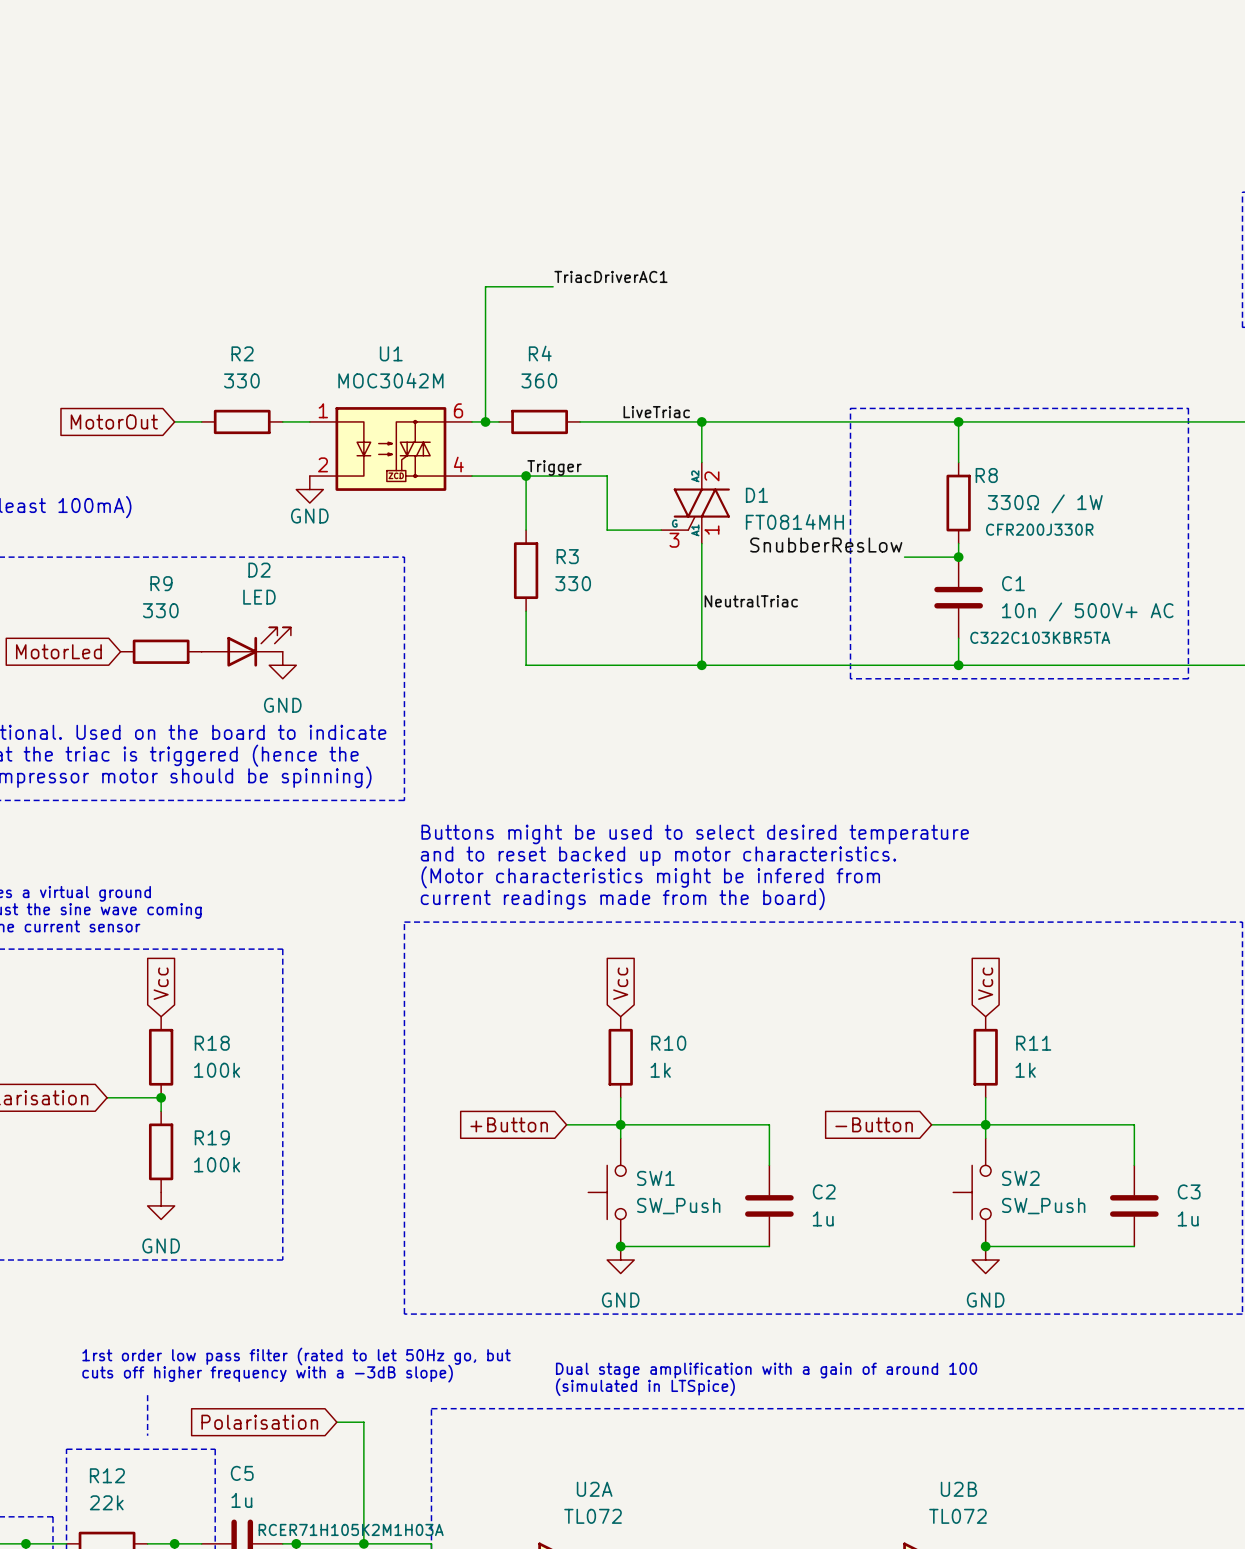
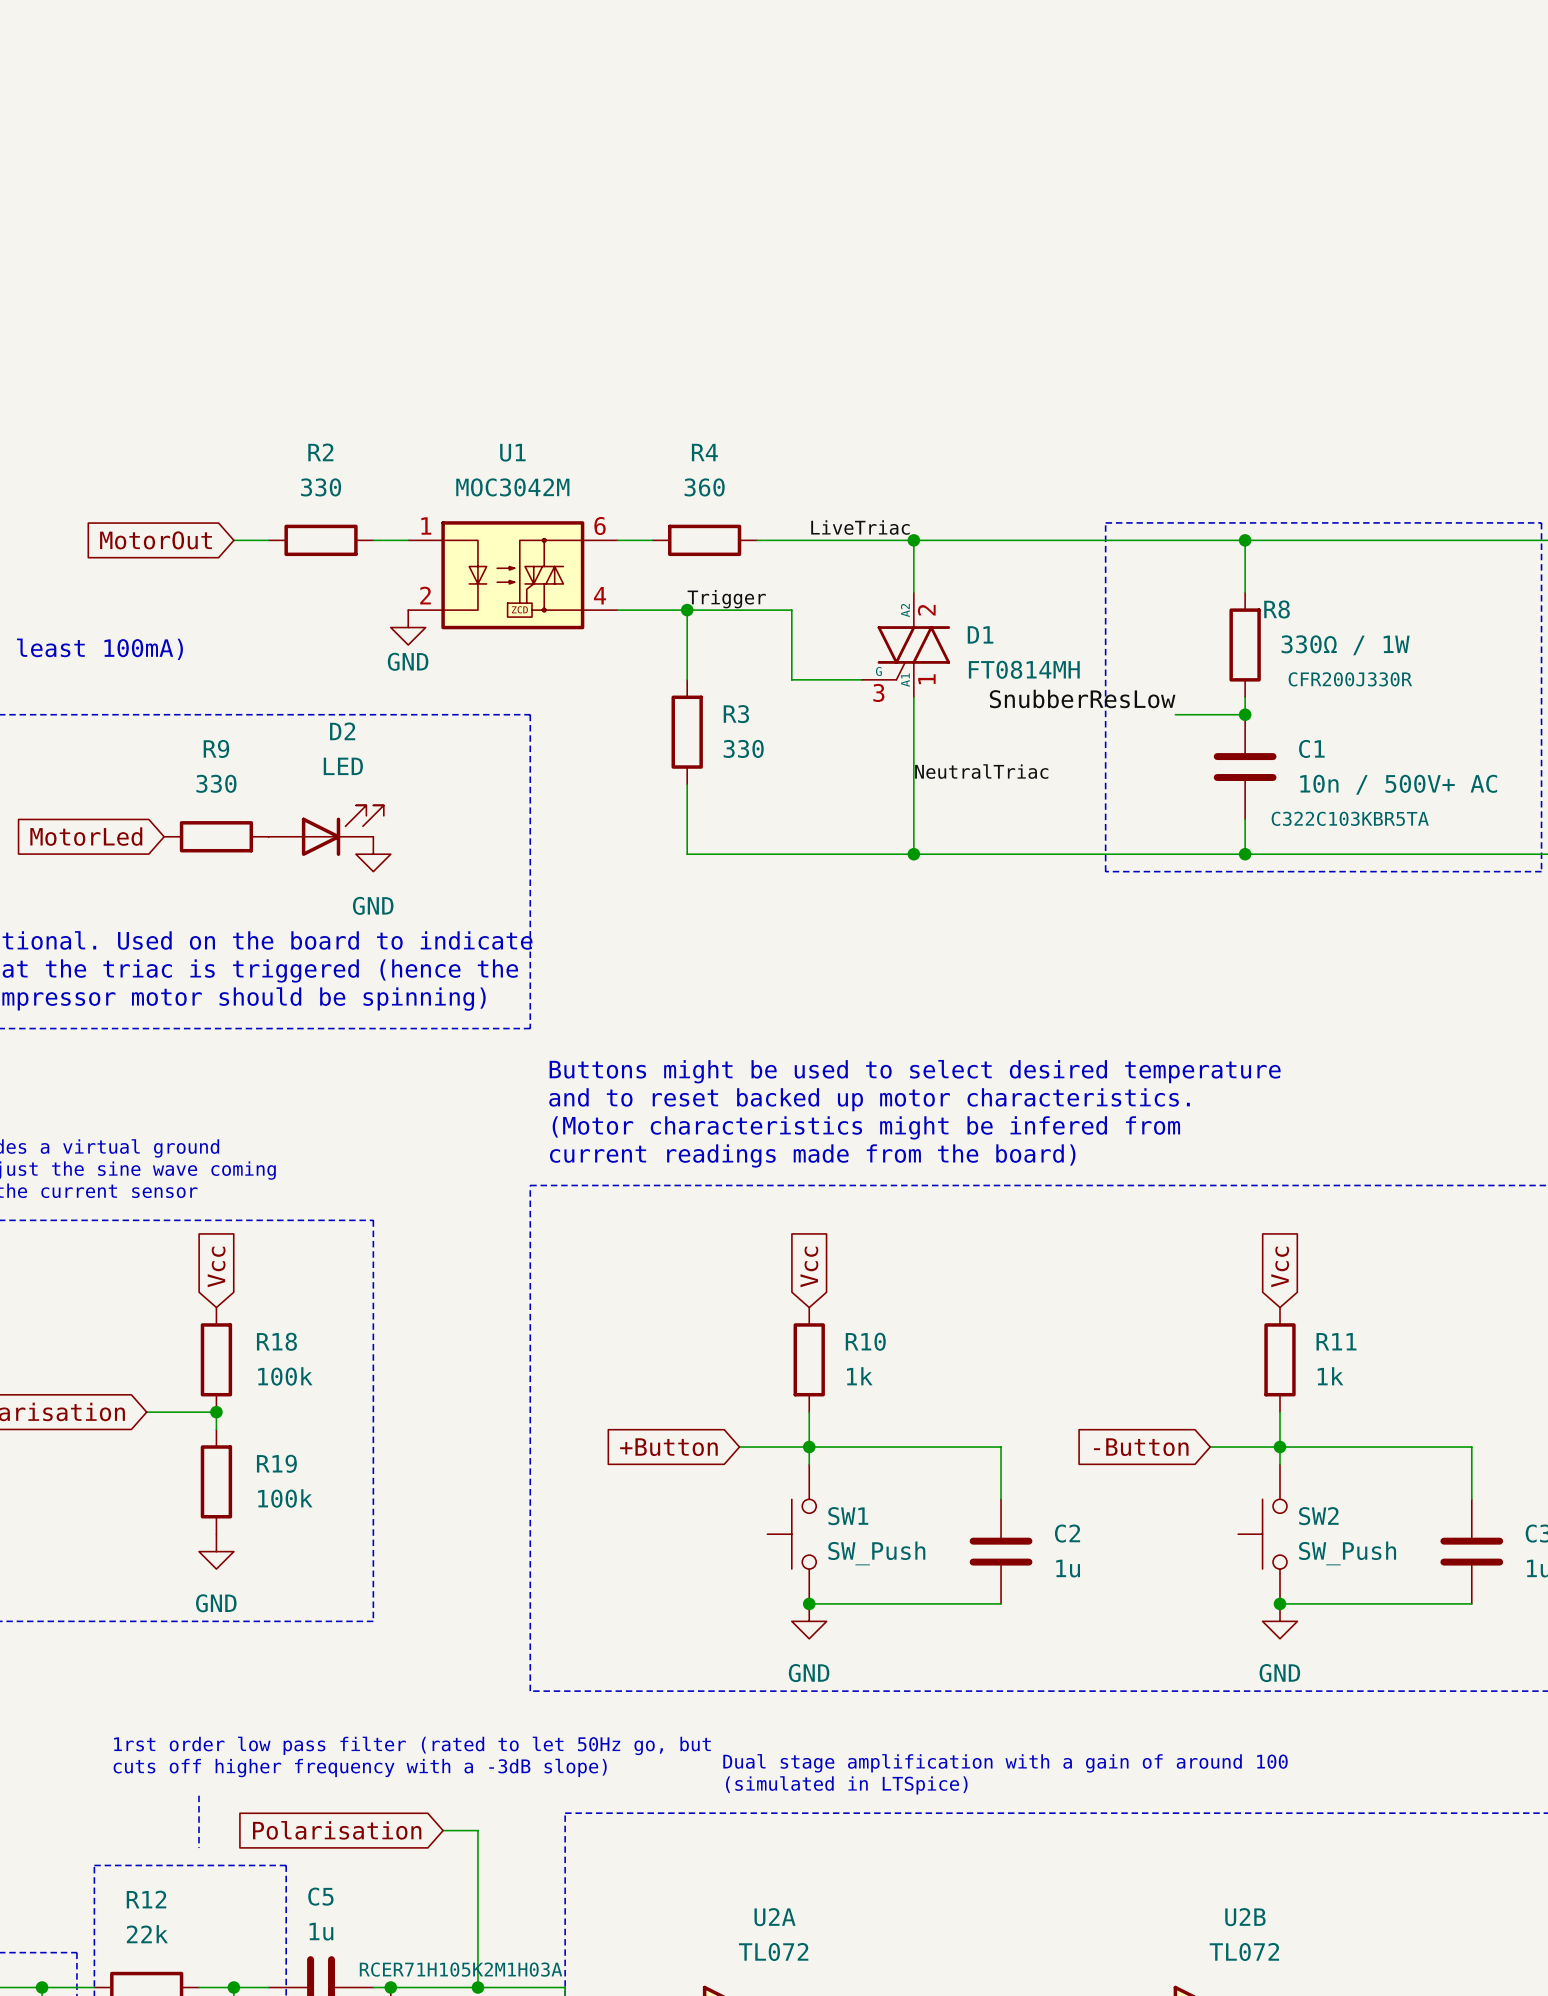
label: TriacDriverAC1 (610, 276) -> none
wire: (553, 286) (485, 286) (485, 421) -> none
junction: (485, 421) -> none

